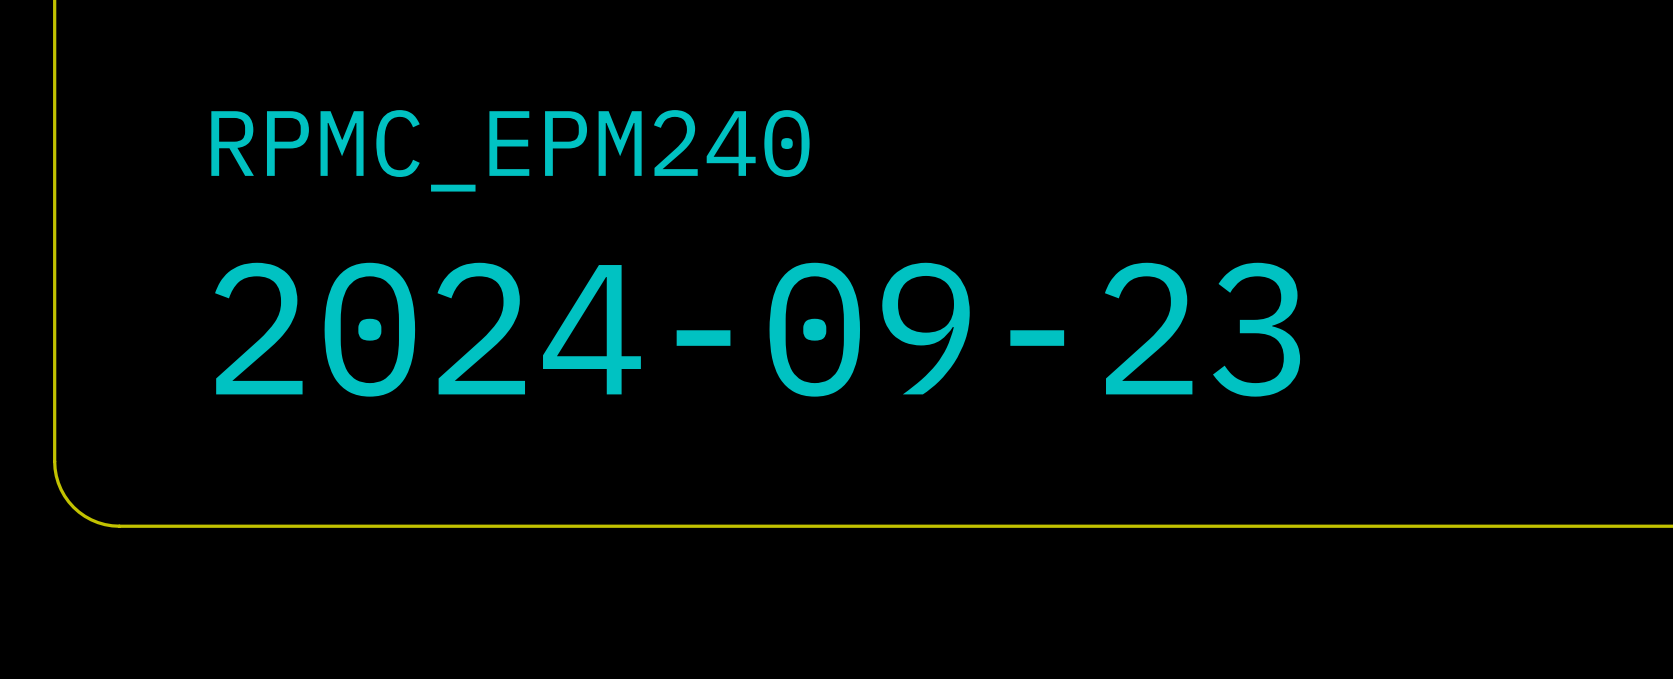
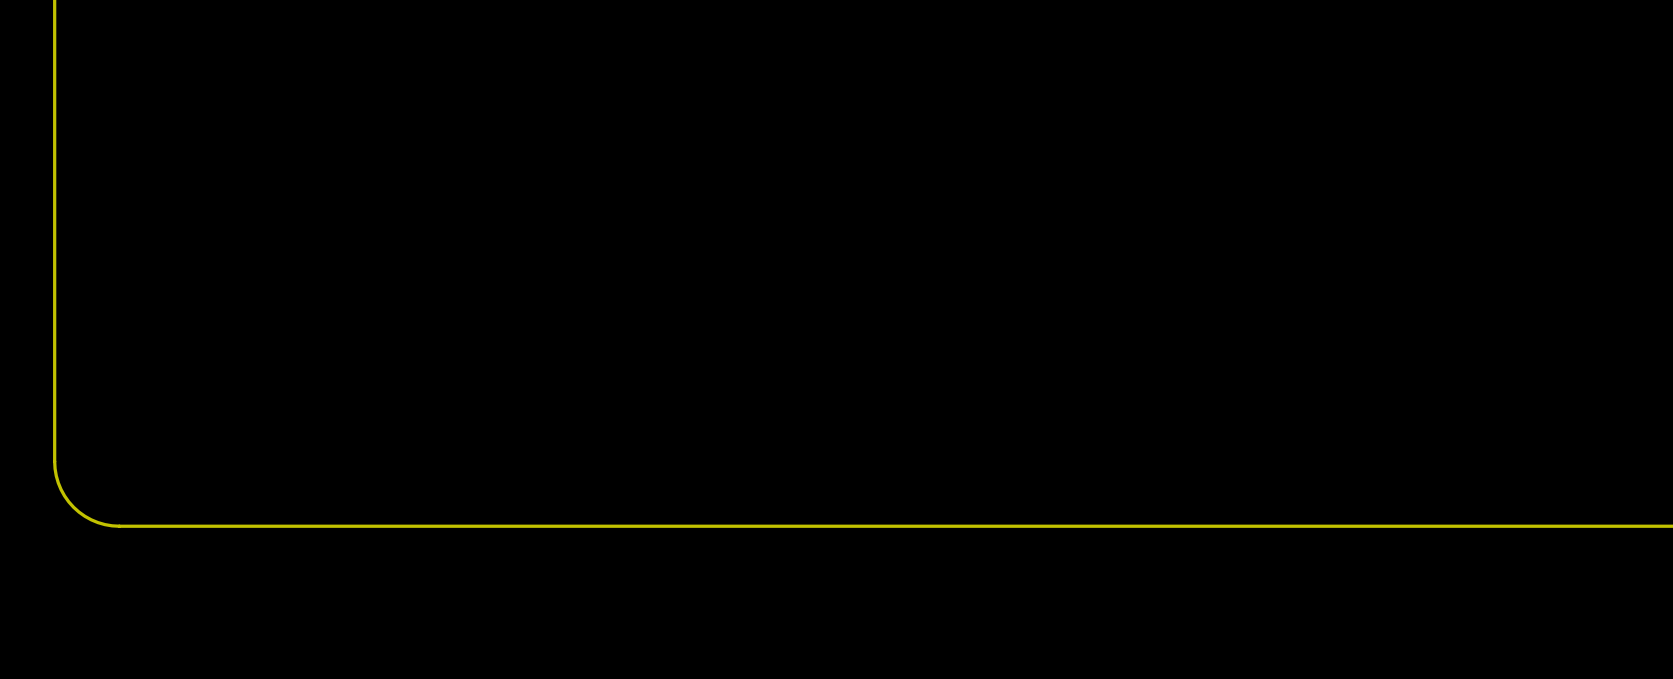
text: RPMC_EPM240 (510, 150) -> none
text: 2024-09-23 (757, 329) -> none

